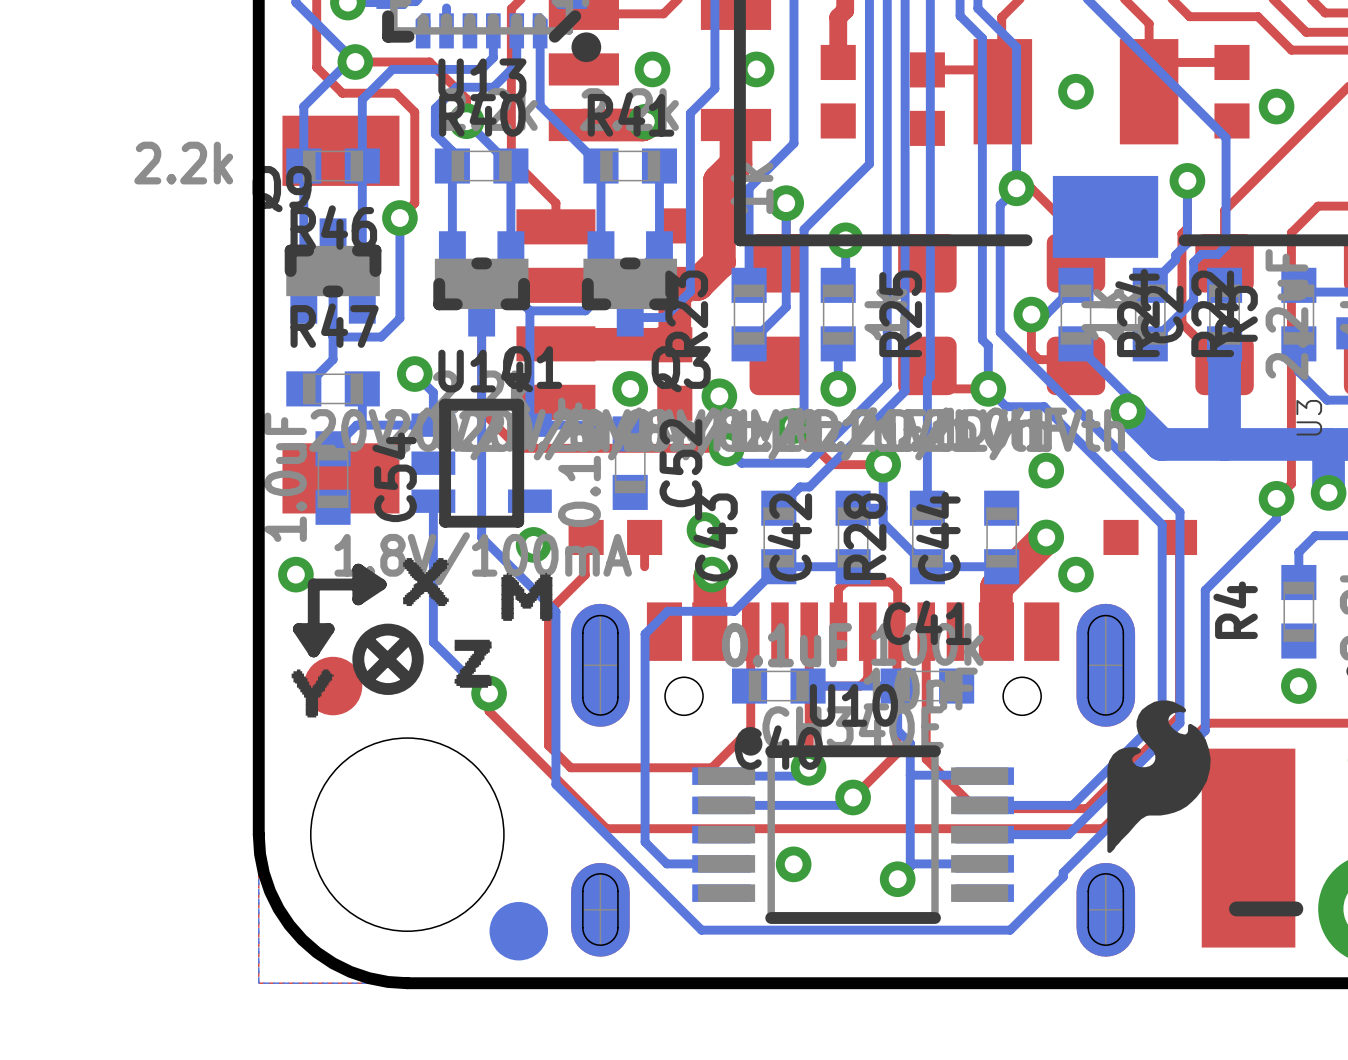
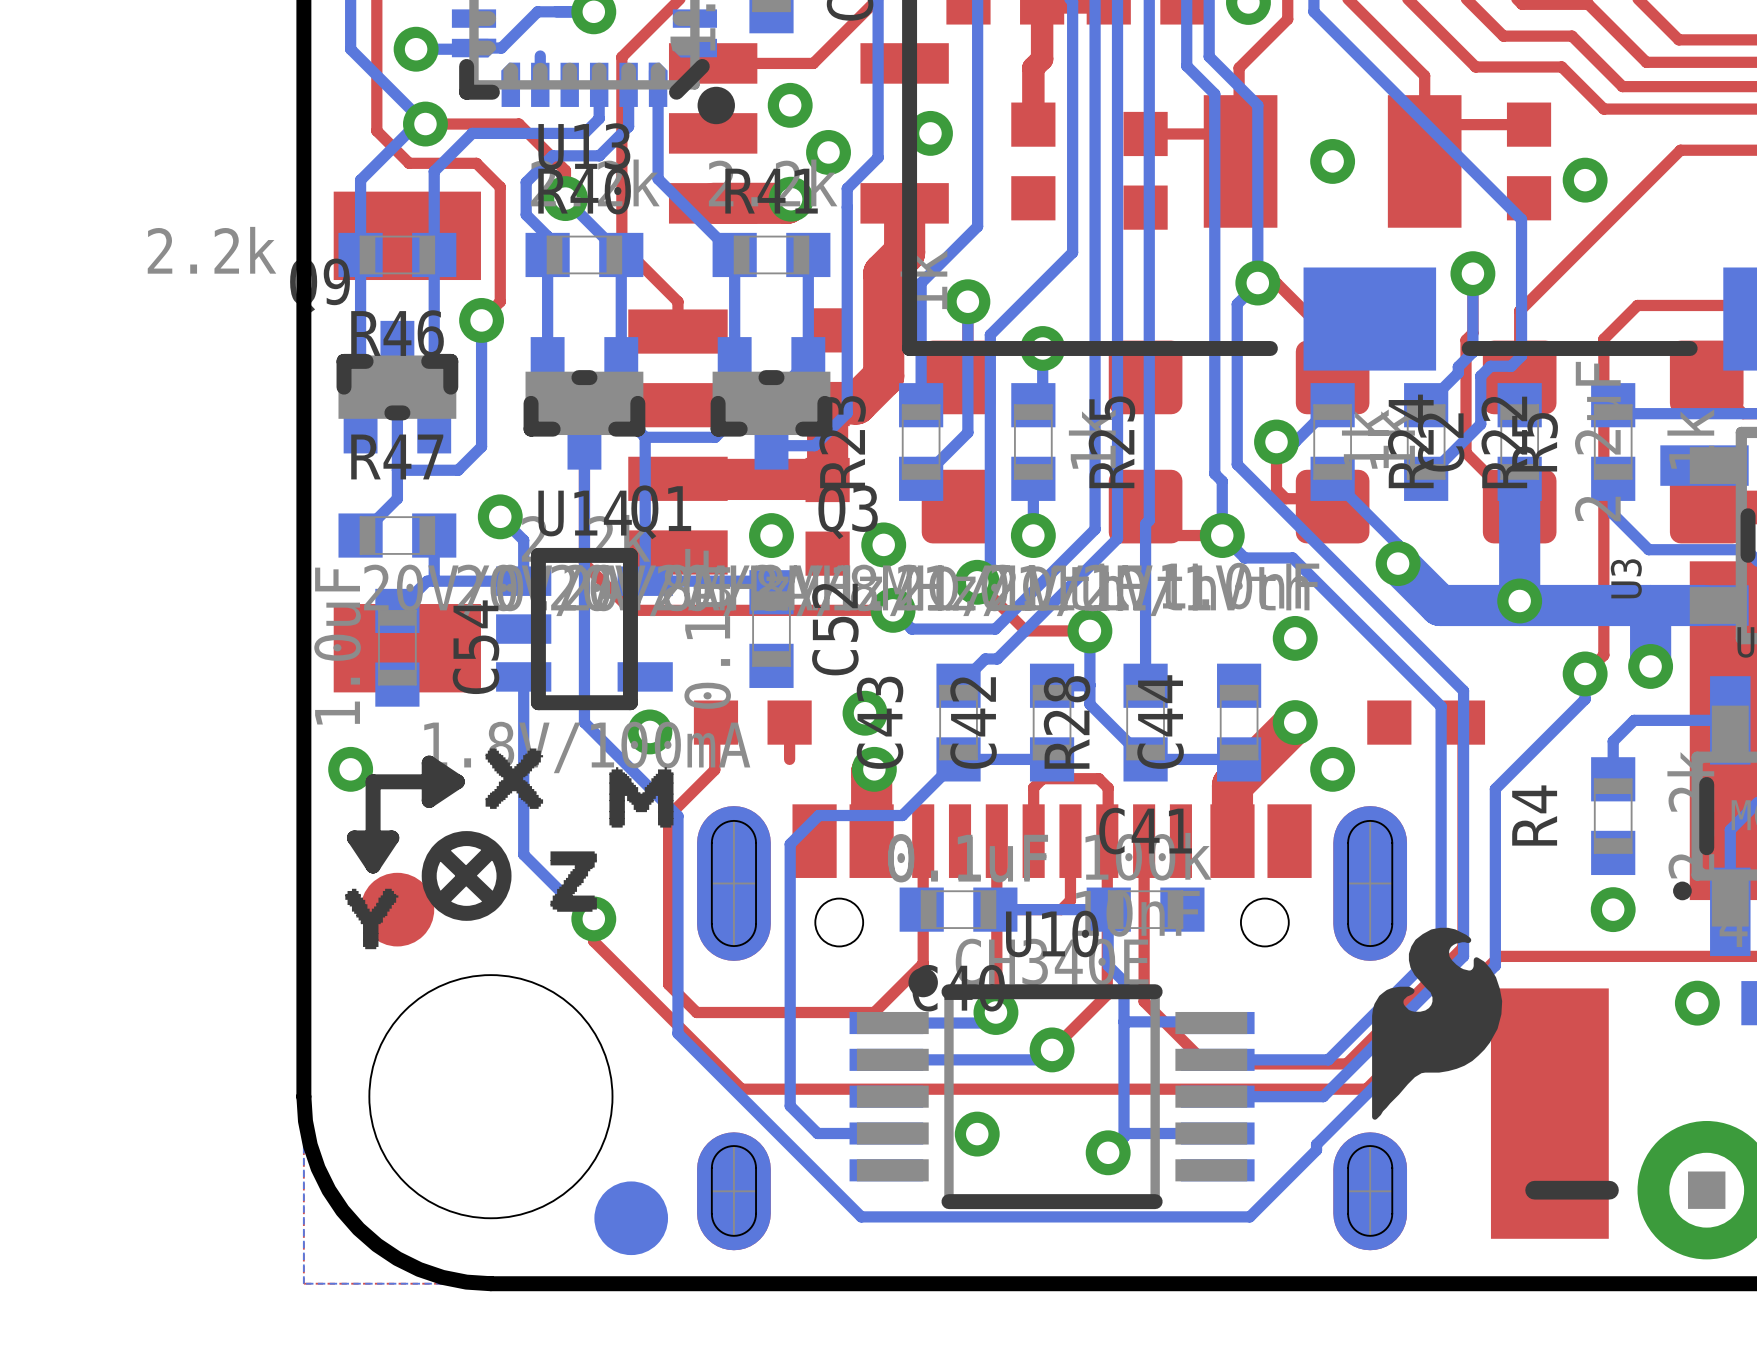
via: none -> (790, 105)
via: (652, 69) -> none
via: none -> (828, 152)
via: none -> (1519, 601)

